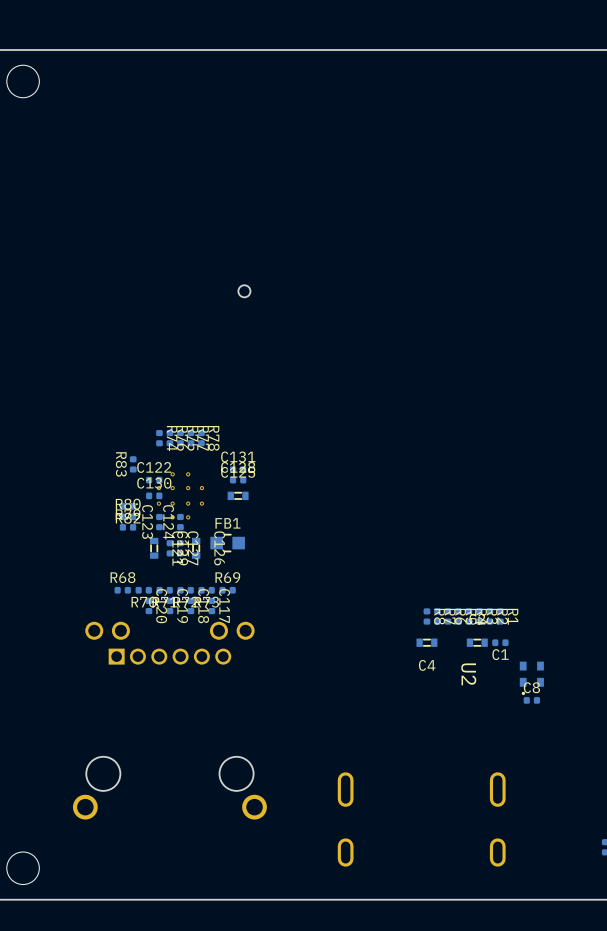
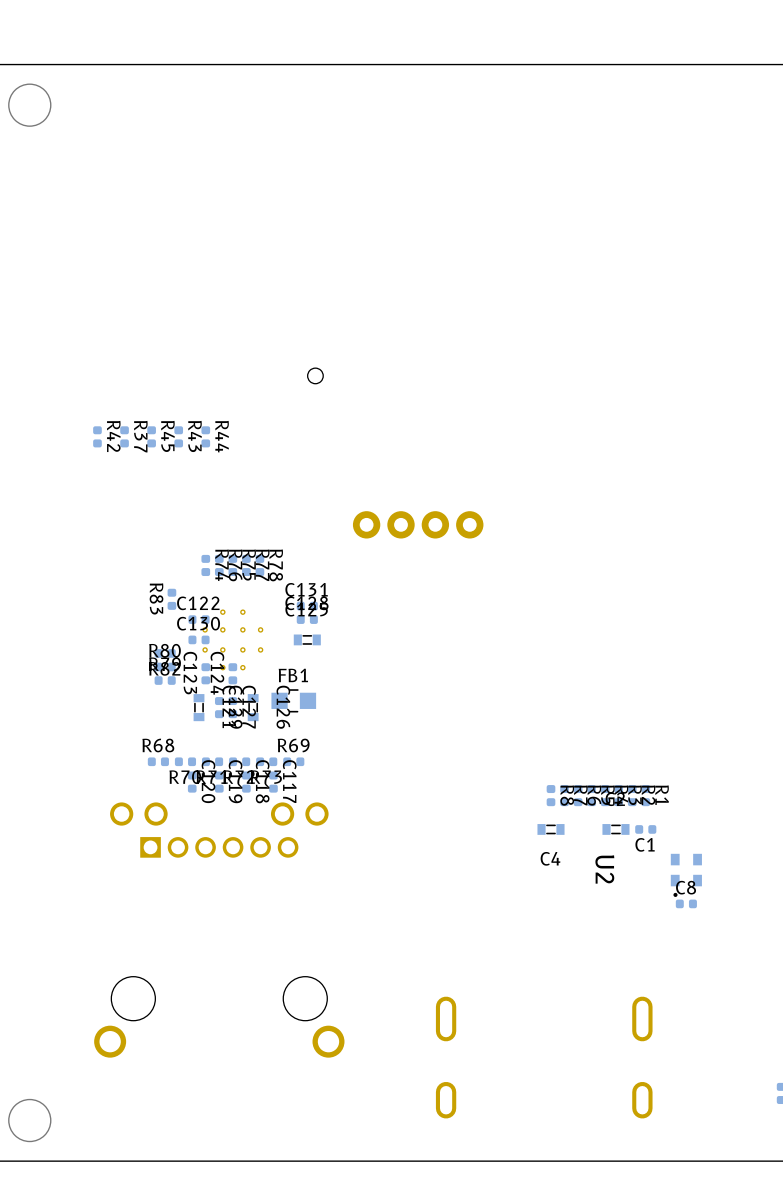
R42: none -> (97, 436)
R37: none -> (124, 436)
R45: none -> (151, 436)
R43: none -> (178, 436)
R44: none -> (205, 436)
part: none -> (418, 524)

